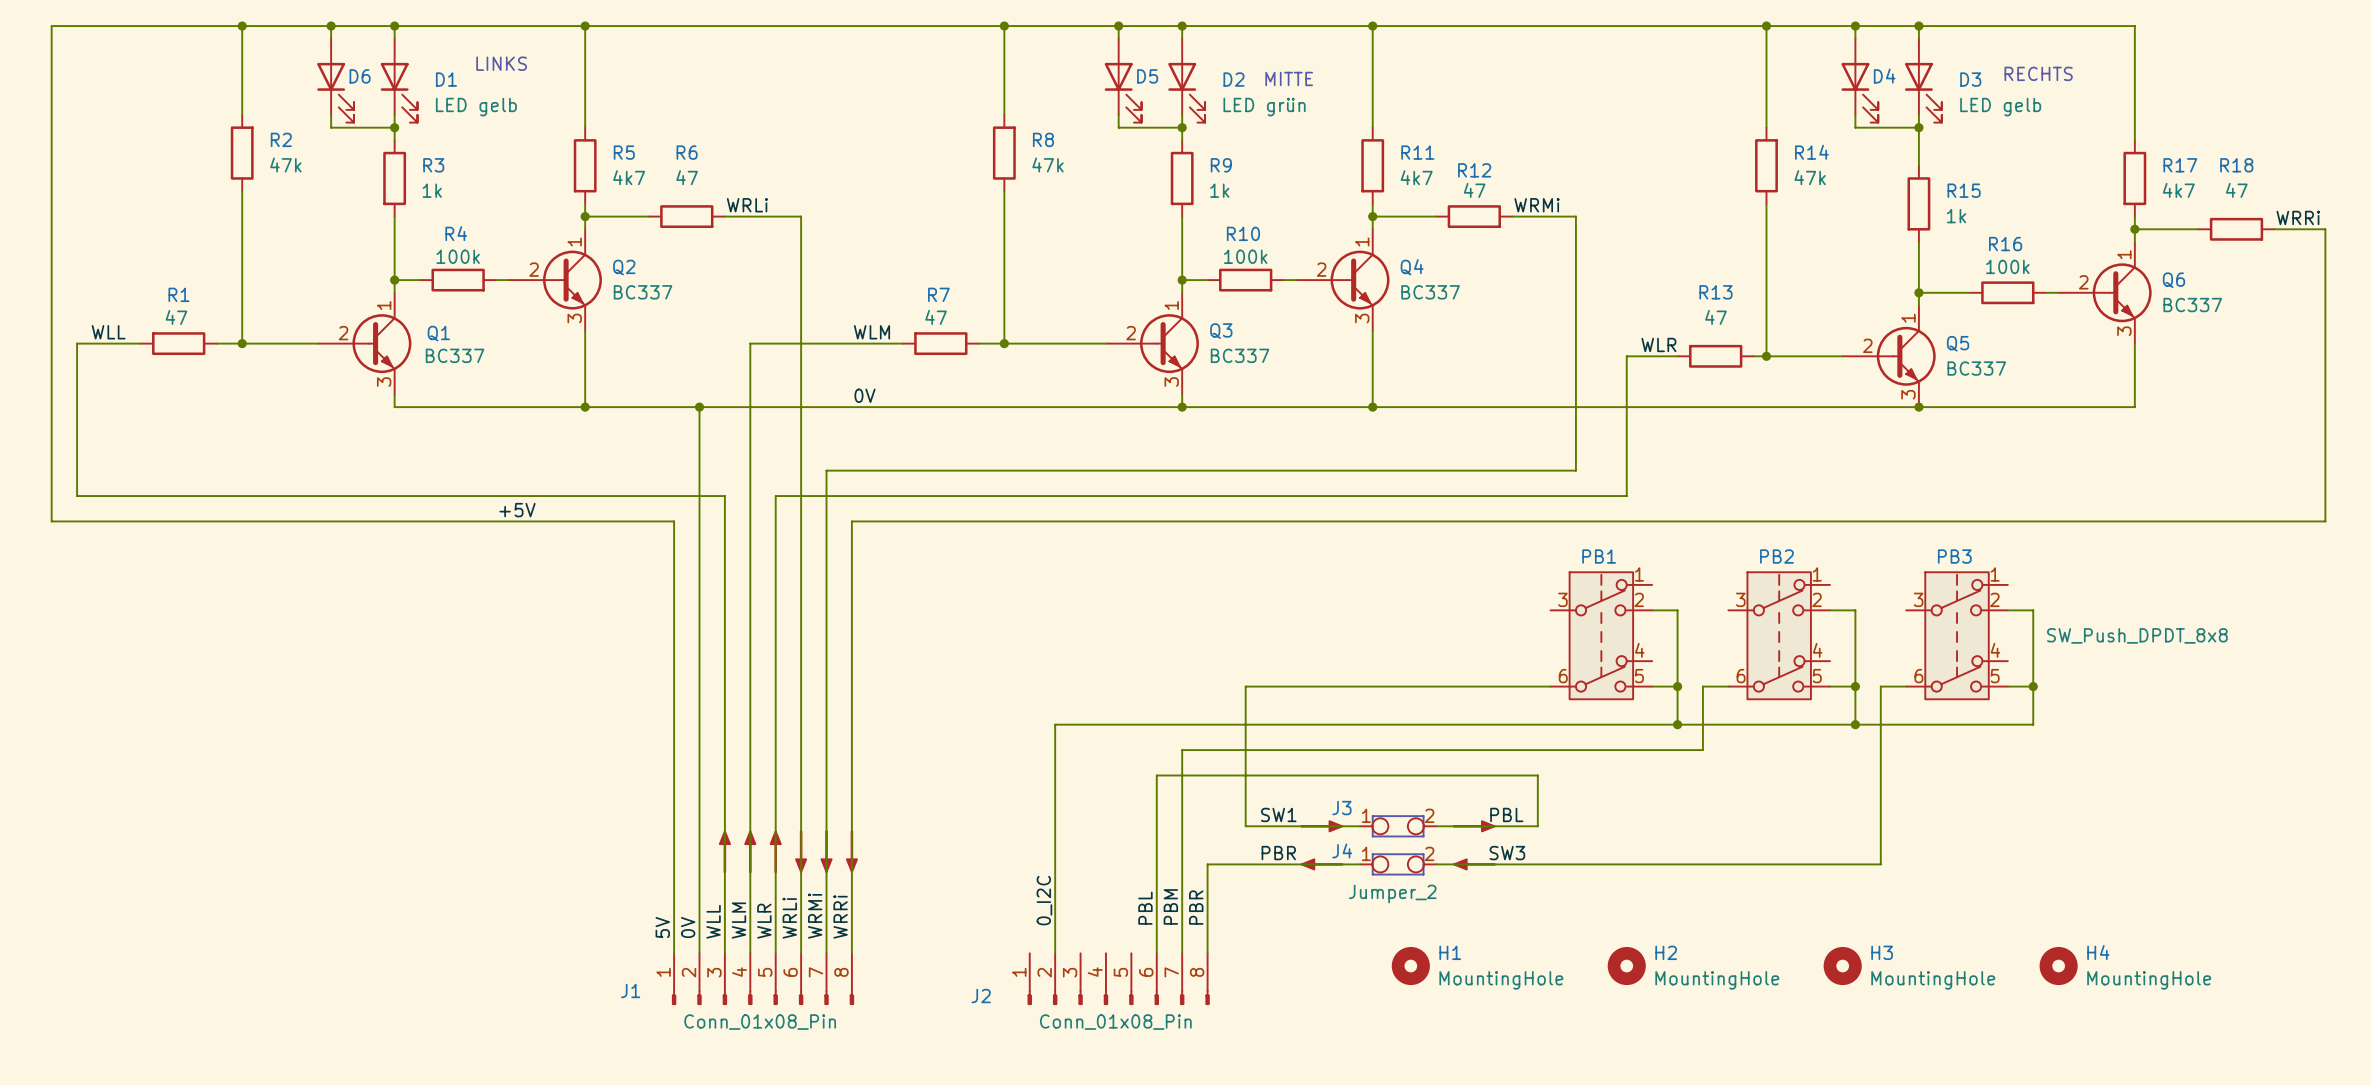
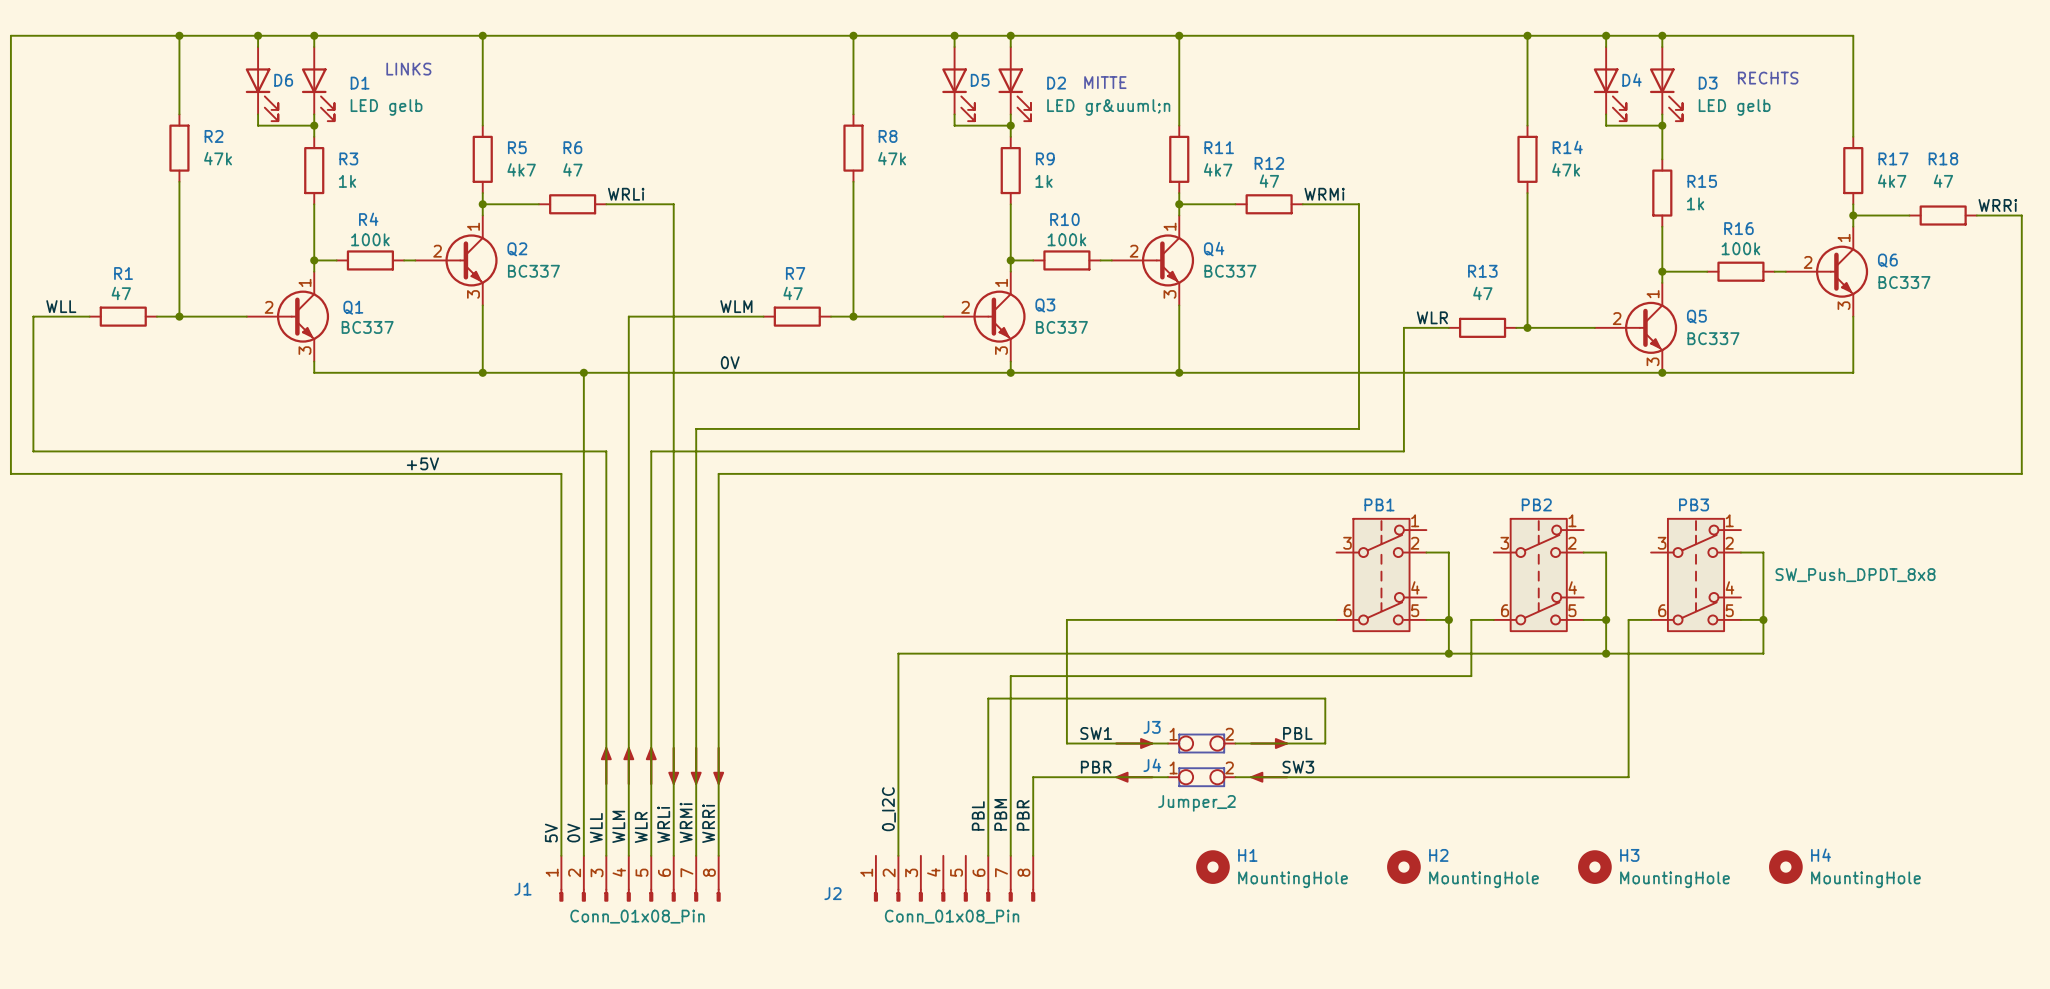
D2 value: LED grün (1264, 107) -> LED gr&uuml;n (1108, 107)

